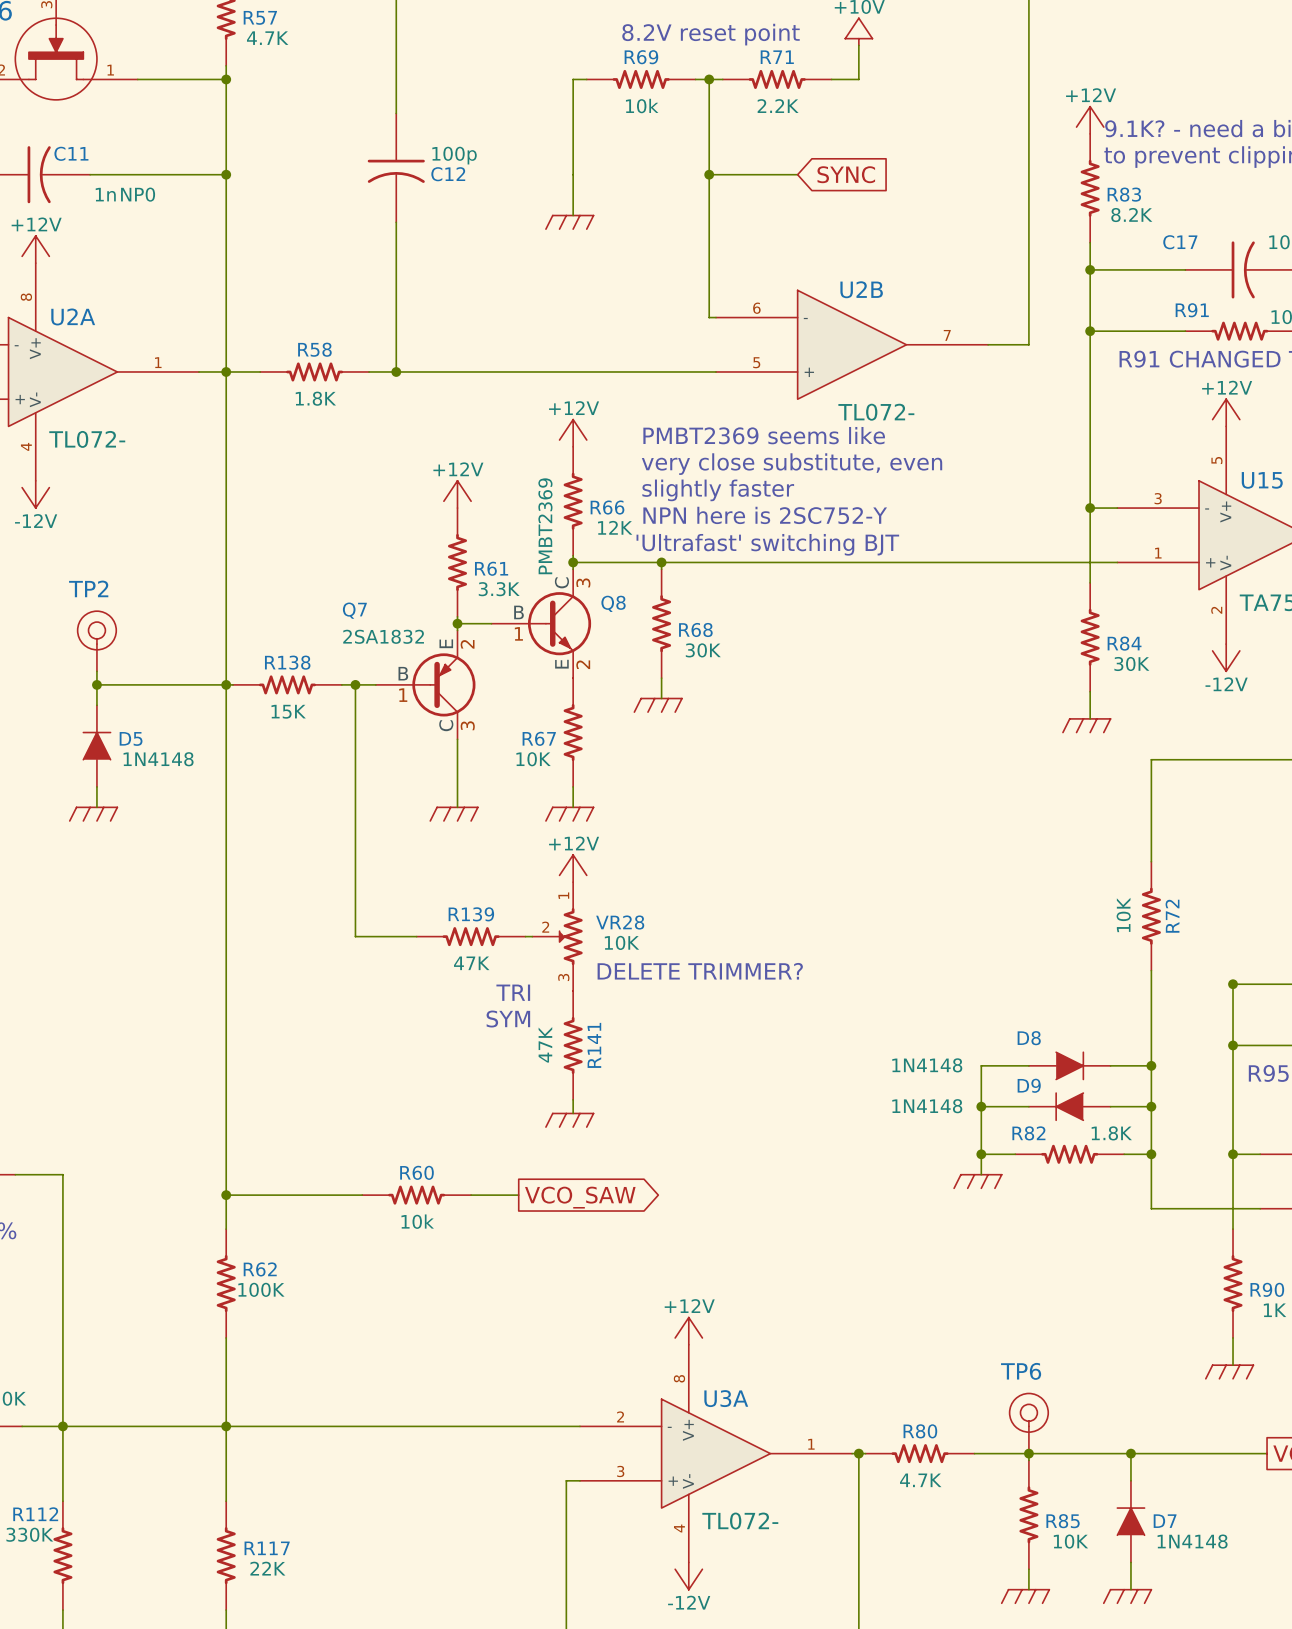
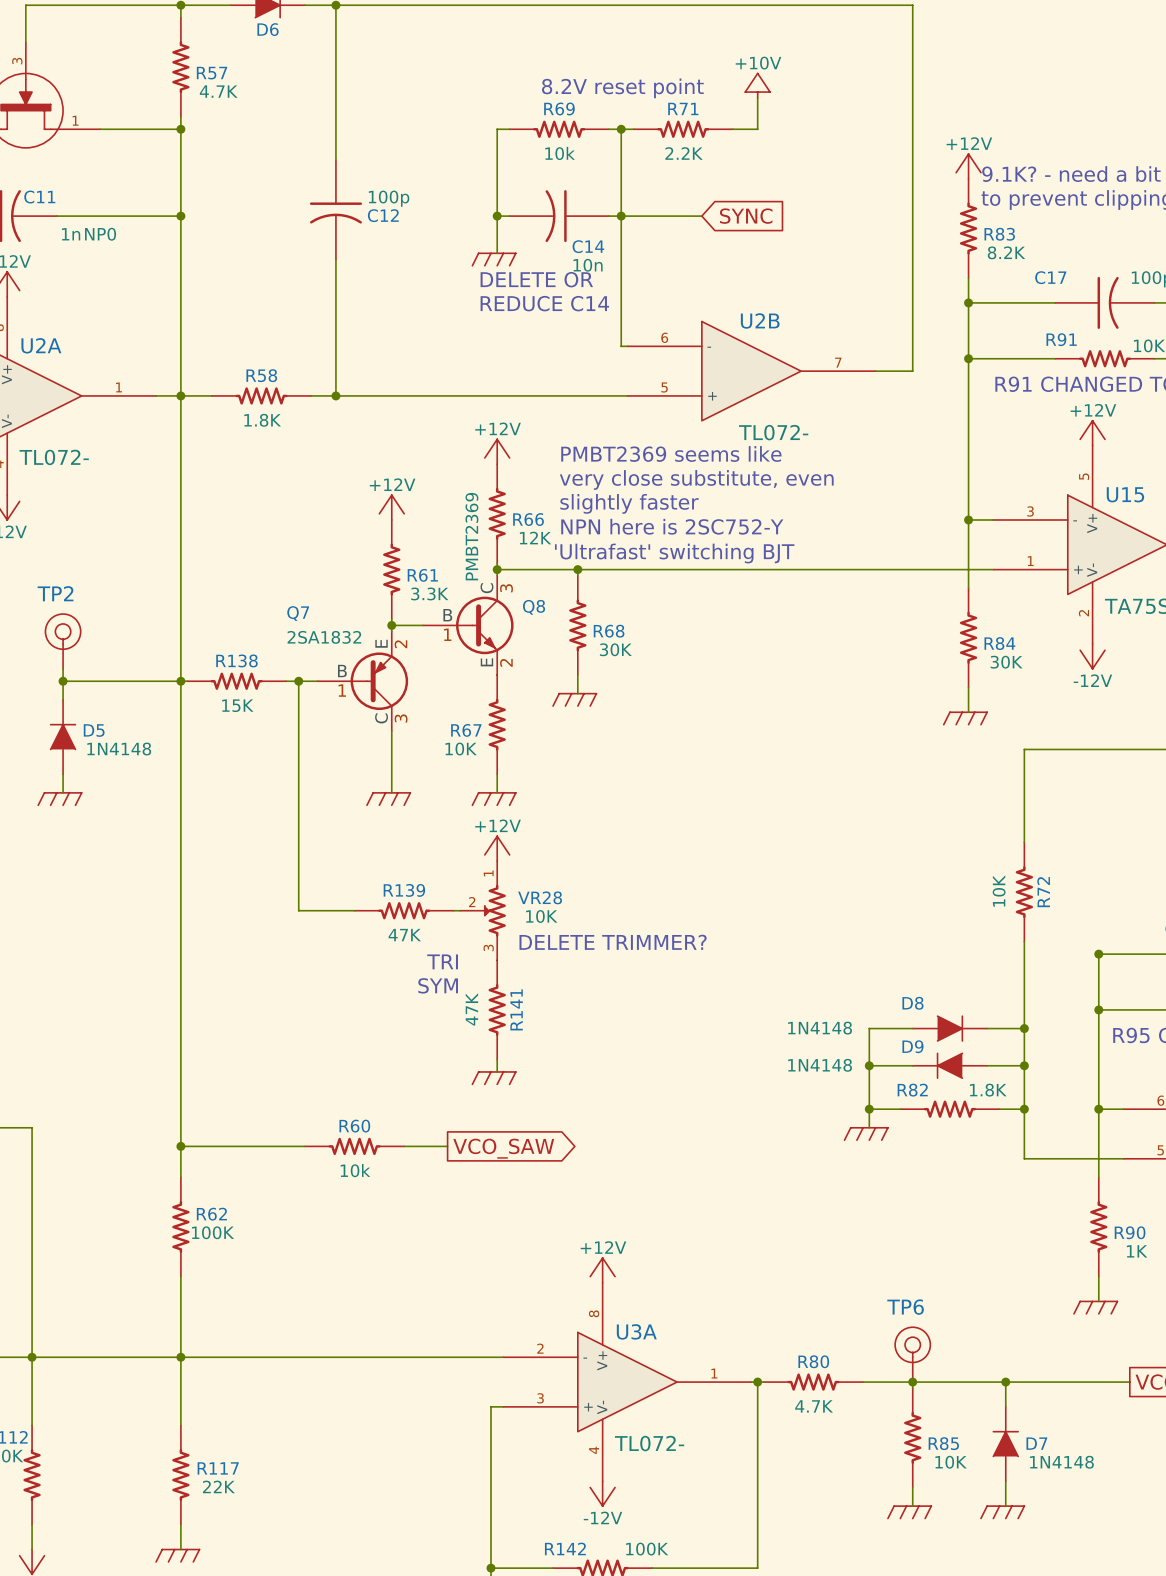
wire: none -> (497, 216) (509, 216)
junction: none -> (497, 216)
C14: none -> 10n (559, 216)
wire: none -> (608, 216) (621, 216)
text: none -> DELETE OR (536, 279)
text: none -> REDUCE C14 (544, 303)

